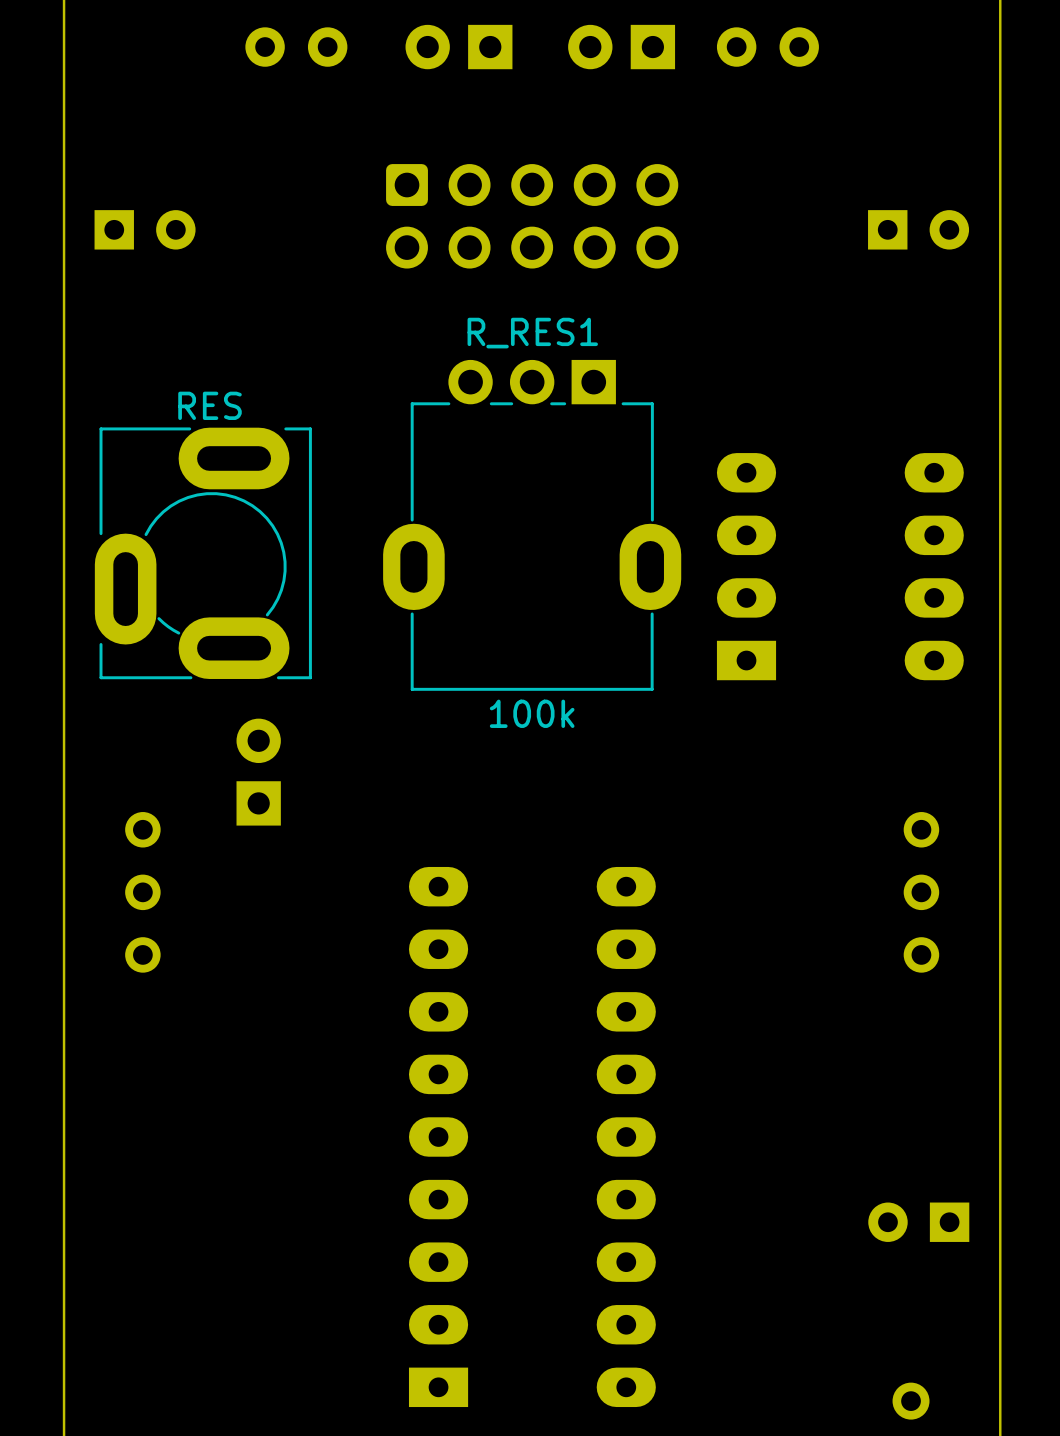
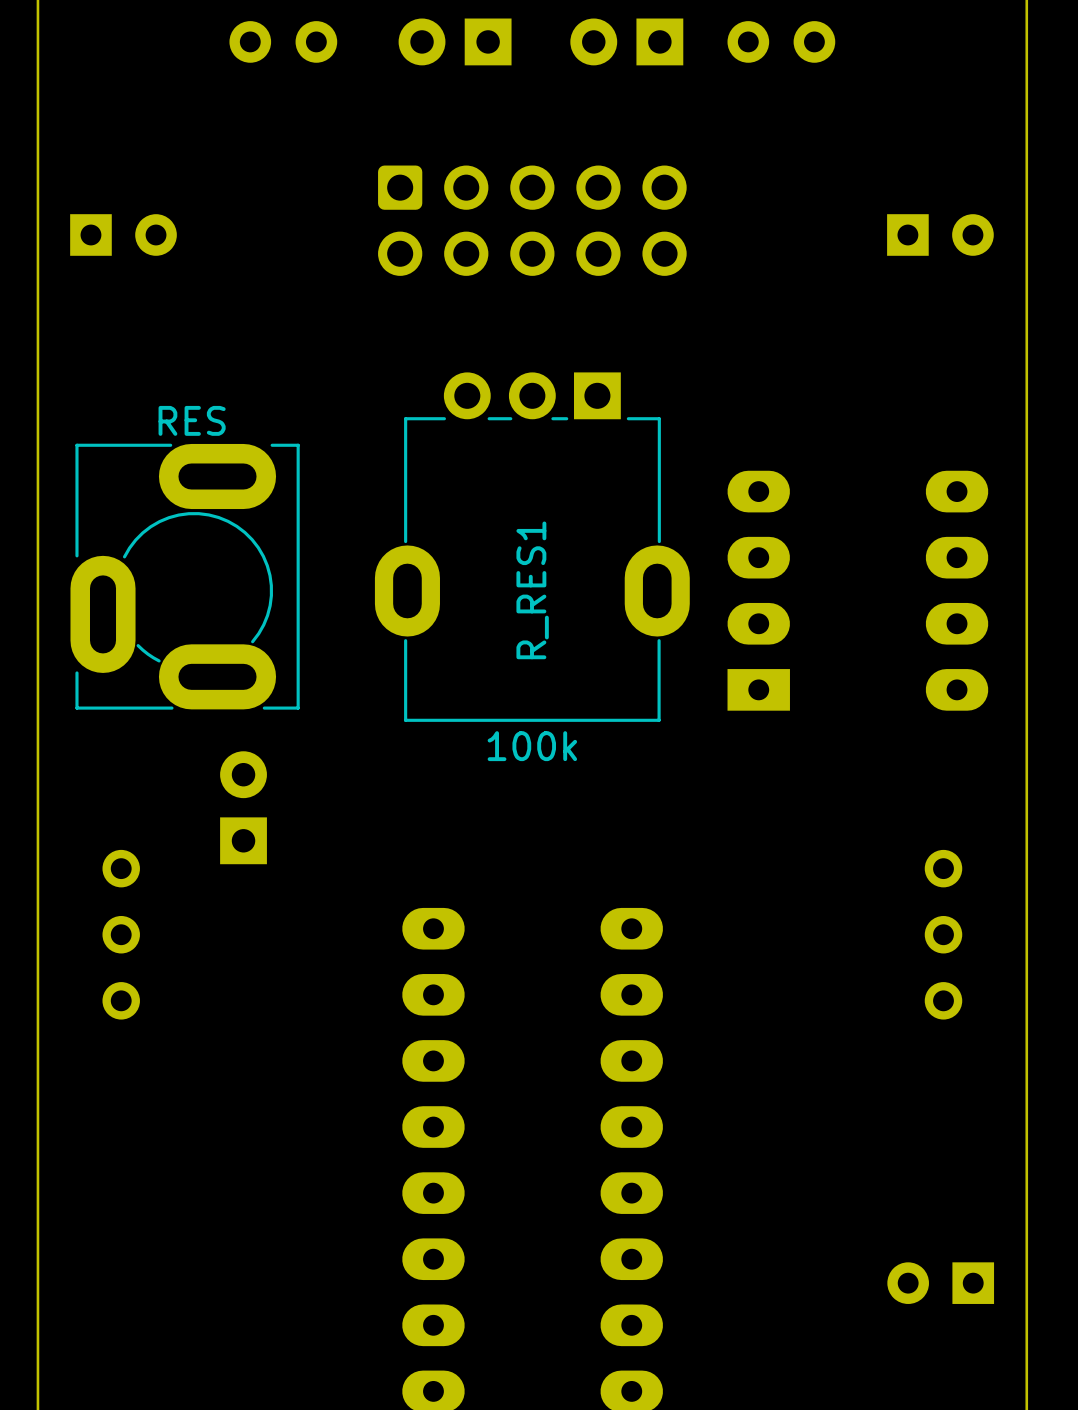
R_RES1 name rotation: 0° (532, 333) -> 90° counterclockwise (532, 590)
R_RES1 name position: R_RES1 (532, 333) -> R_RES1 (532, 590)

